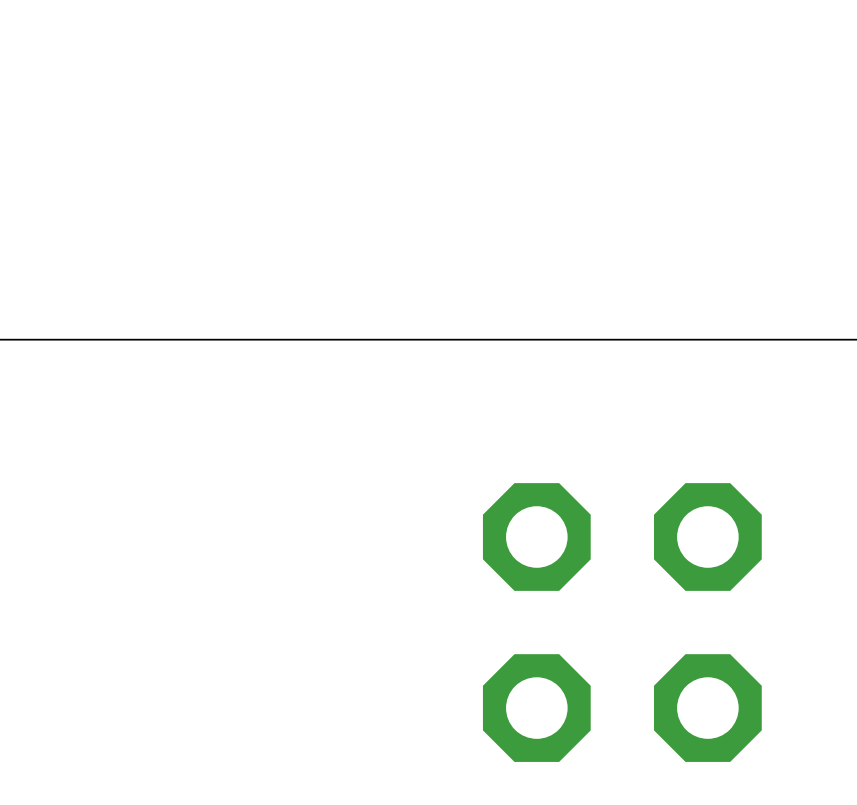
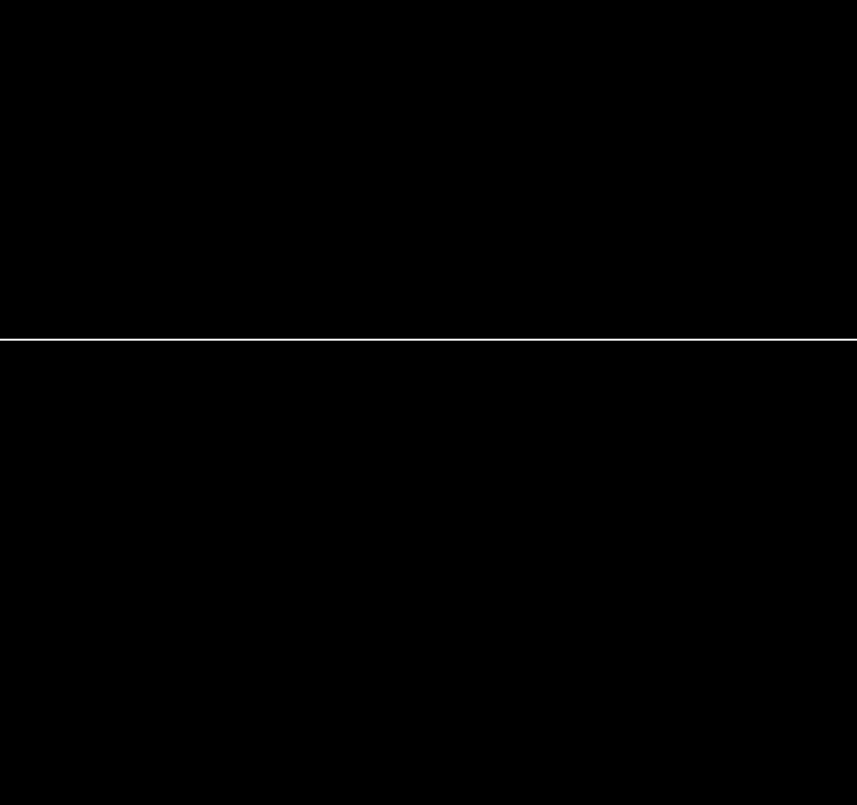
part: (536, 537) -> none
part: (707, 537) -> none
part: (536, 708) -> none
part: (707, 708) -> none

